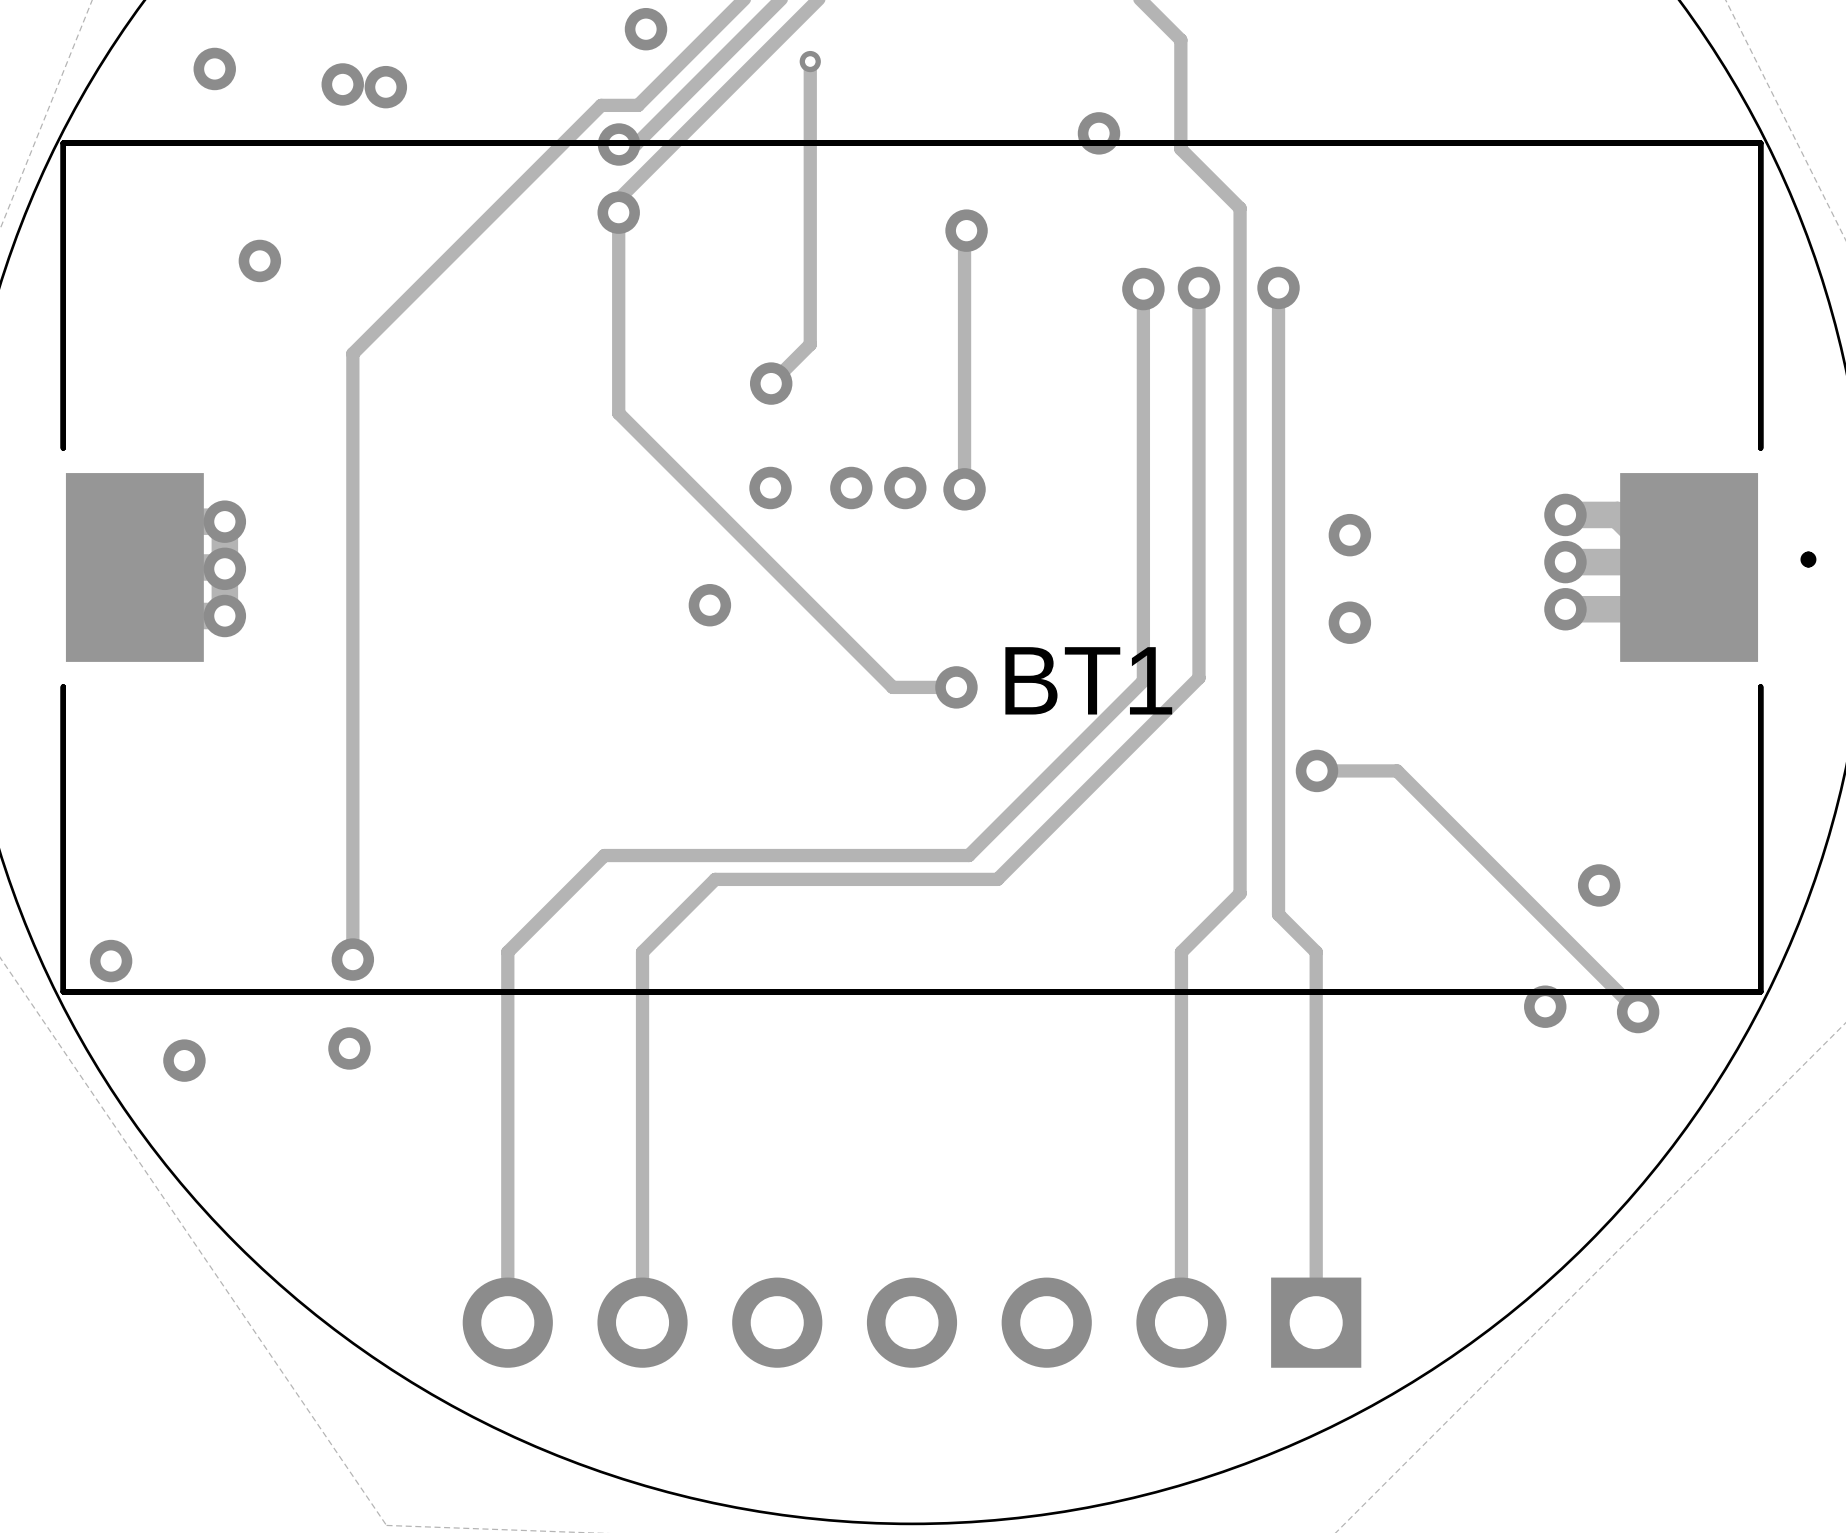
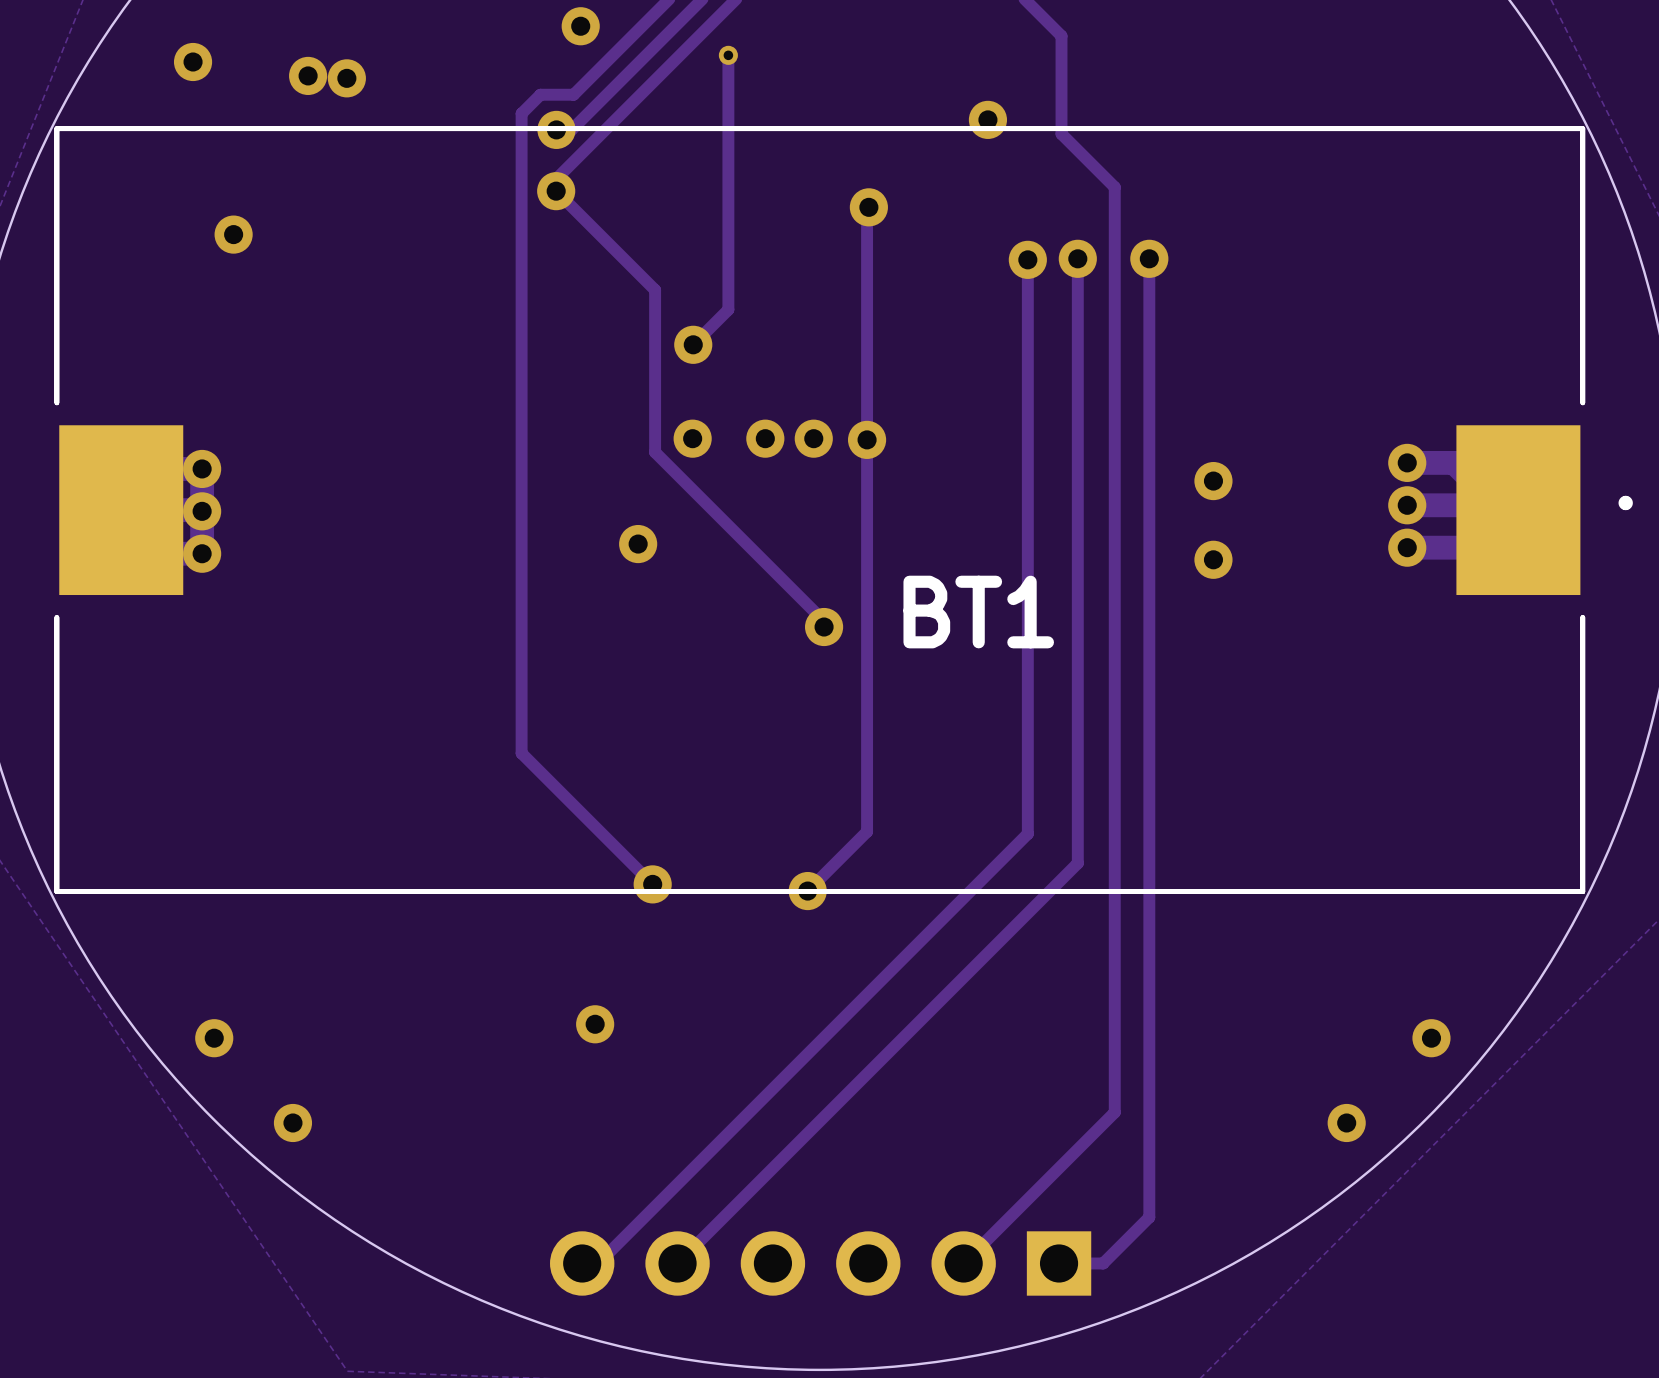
track: (580, 126) (352, 353) (352, 959) -> (521, 113) (521, 753) (652, 884)
track: (618, 212) (618, 413) (892, 687) (956, 687) -> (556, 191) (655, 290) (655, 452) (824, 621) (824, 627)
track: none -> (867, 439) (867, 831) (807, 891)
track: (1198, 677) (997, 879) (715, 879) (642, 952) (642, 1322) -> (1077, 609) (1077, 863) (677, 1263)
track: (1143, 681) (968, 855) (604, 855) (507, 952) (507, 1322) -> (1027, 612) (1027, 833) (598, 1263) (582, 1263)
via position: (956, 687) -> (824, 627)
track: (1316, 770) (1397, 770) (1638, 1012) -> none
via: (1316, 770) -> none
via: (1599, 885) -> none
track: (1240, 893) (1181, 952) (1181, 1322) -> (1114, 803) (1114, 1112) (963, 1263)
track: (1278, 914) (1316, 952) (1316, 1322) -> (1149, 822) (1149, 1217) (1103, 1263) (1059, 1263)
via: (352, 959) -> none
via: (111, 961) -> none
via: none -> (652, 884)
via: none -> (807, 891)
via: (1545, 1006) -> none
via: (1638, 1012) -> none
via: (349, 1048) -> none
via: (184, 1060) -> none
via: none -> (595, 1024)
via: none -> (214, 1038)
via: none -> (1431, 1038)
via: none -> (292, 1122)
via: none -> (1346, 1122)
part: (911, 1322) -> none
part: none -> (820, 1263)

